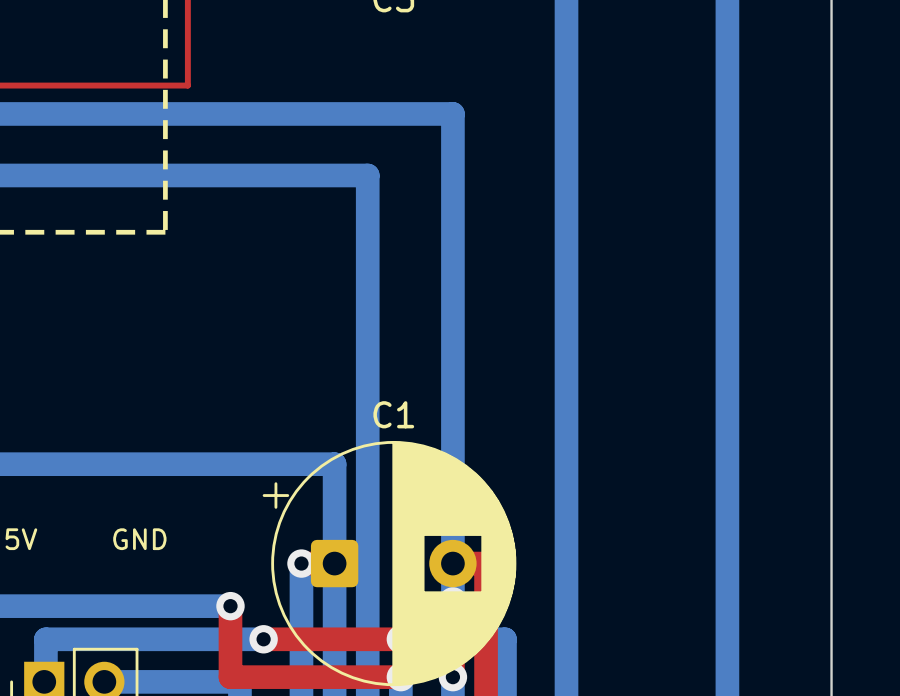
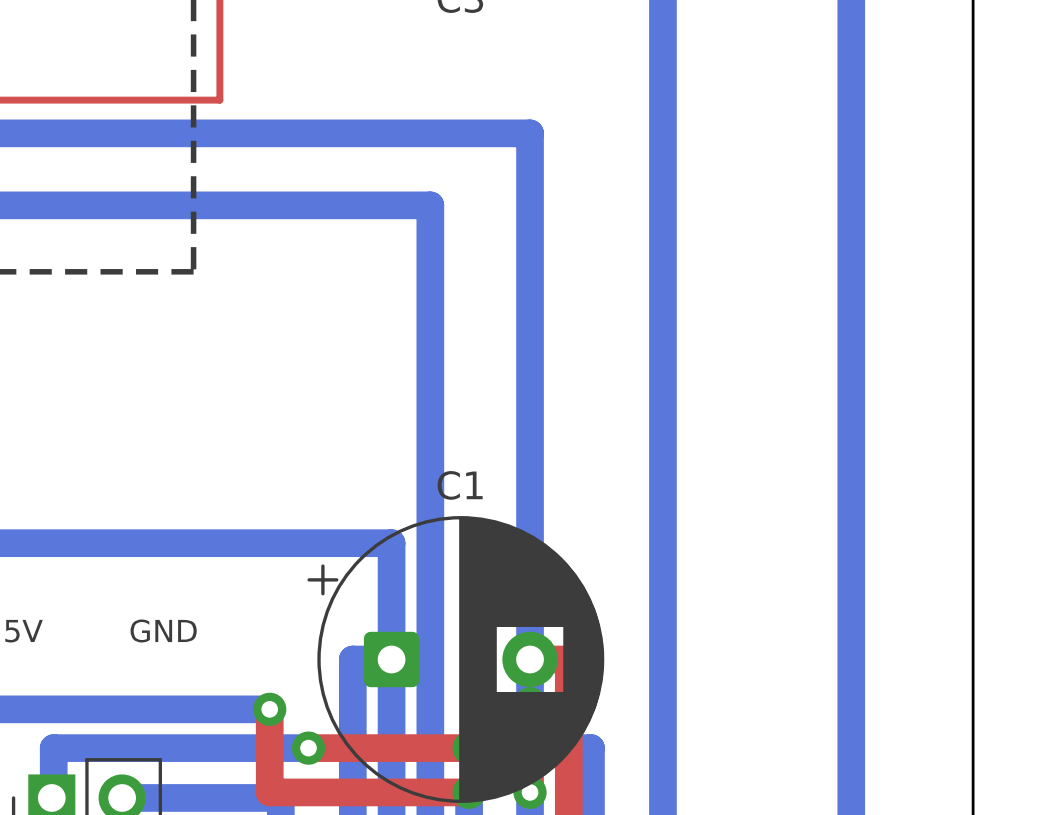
via: (301, 563) -> none

